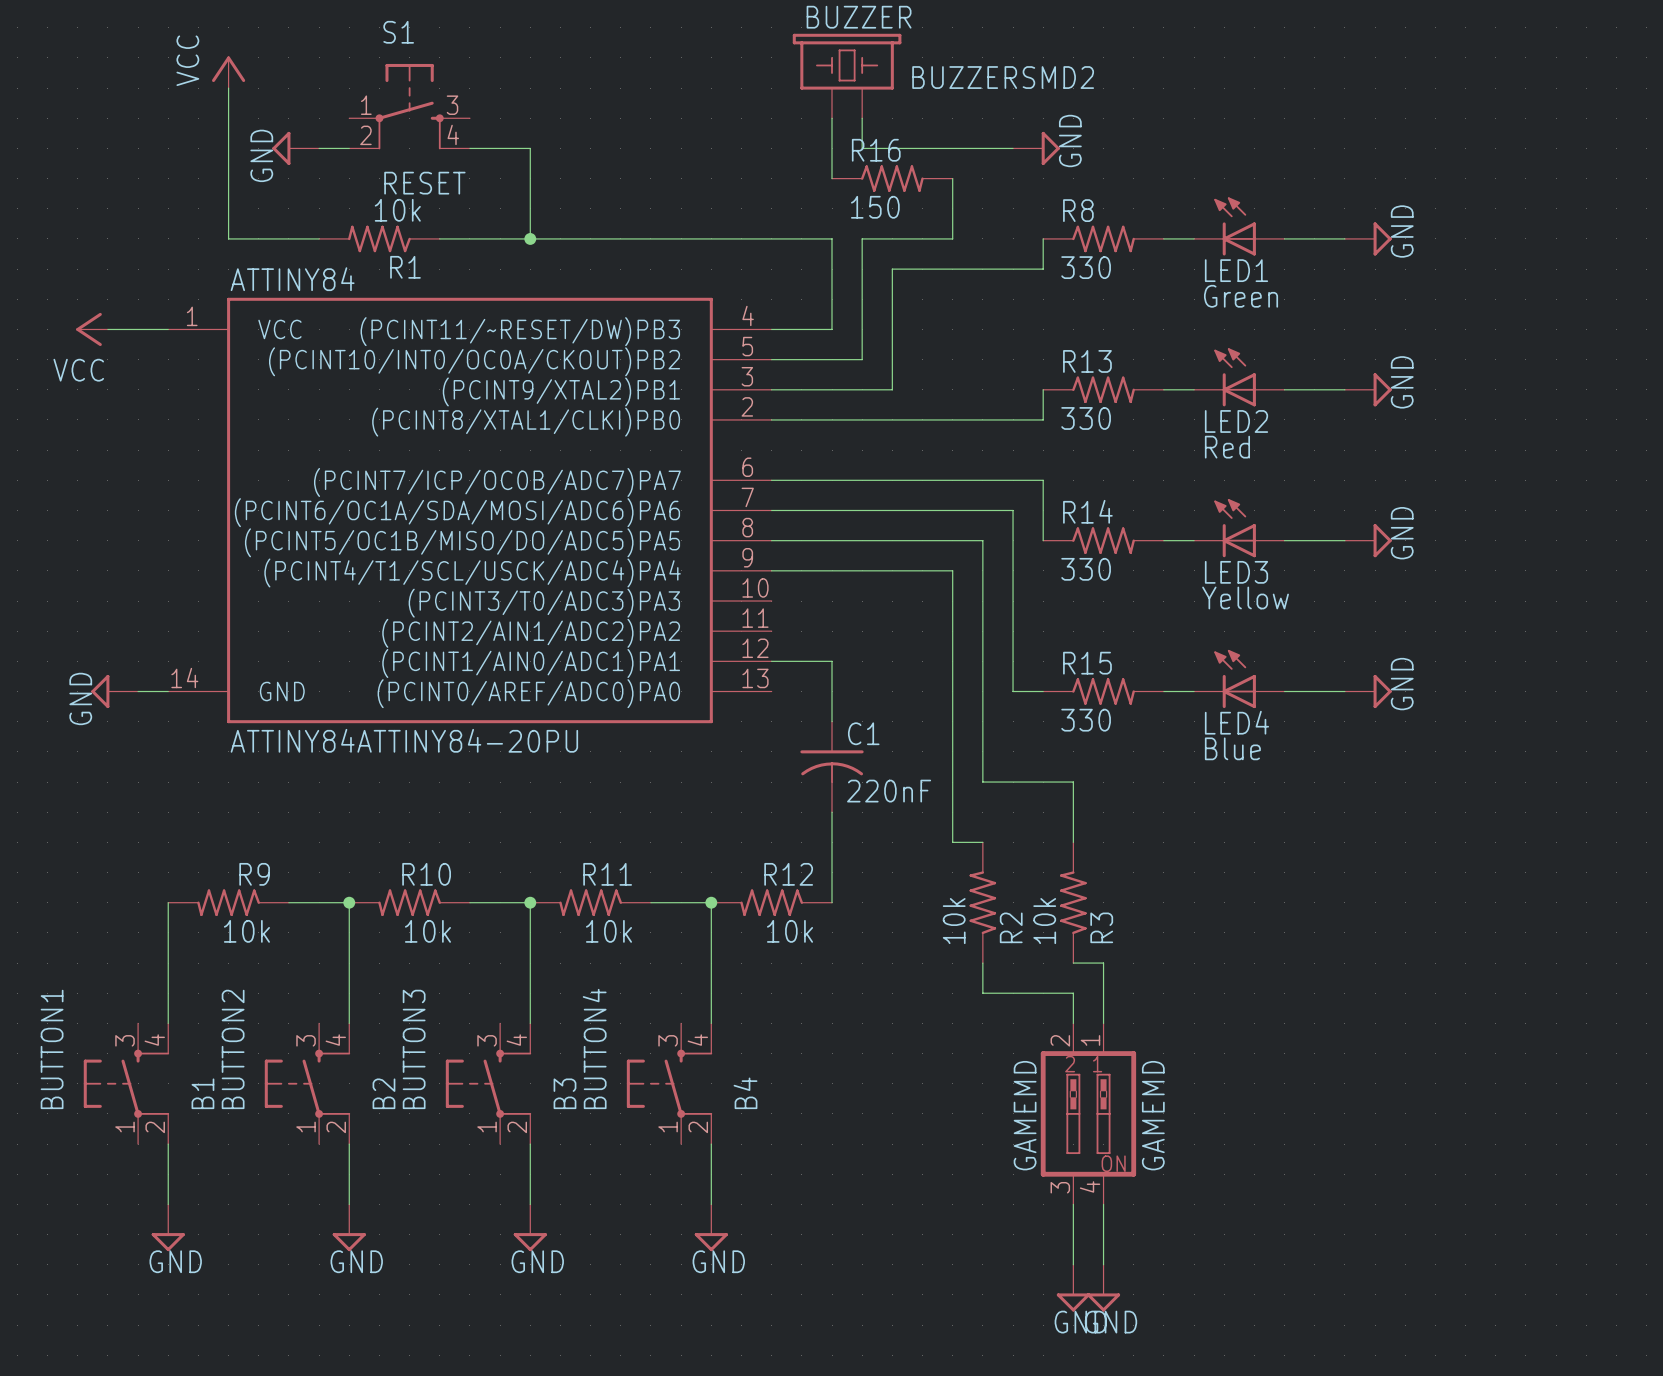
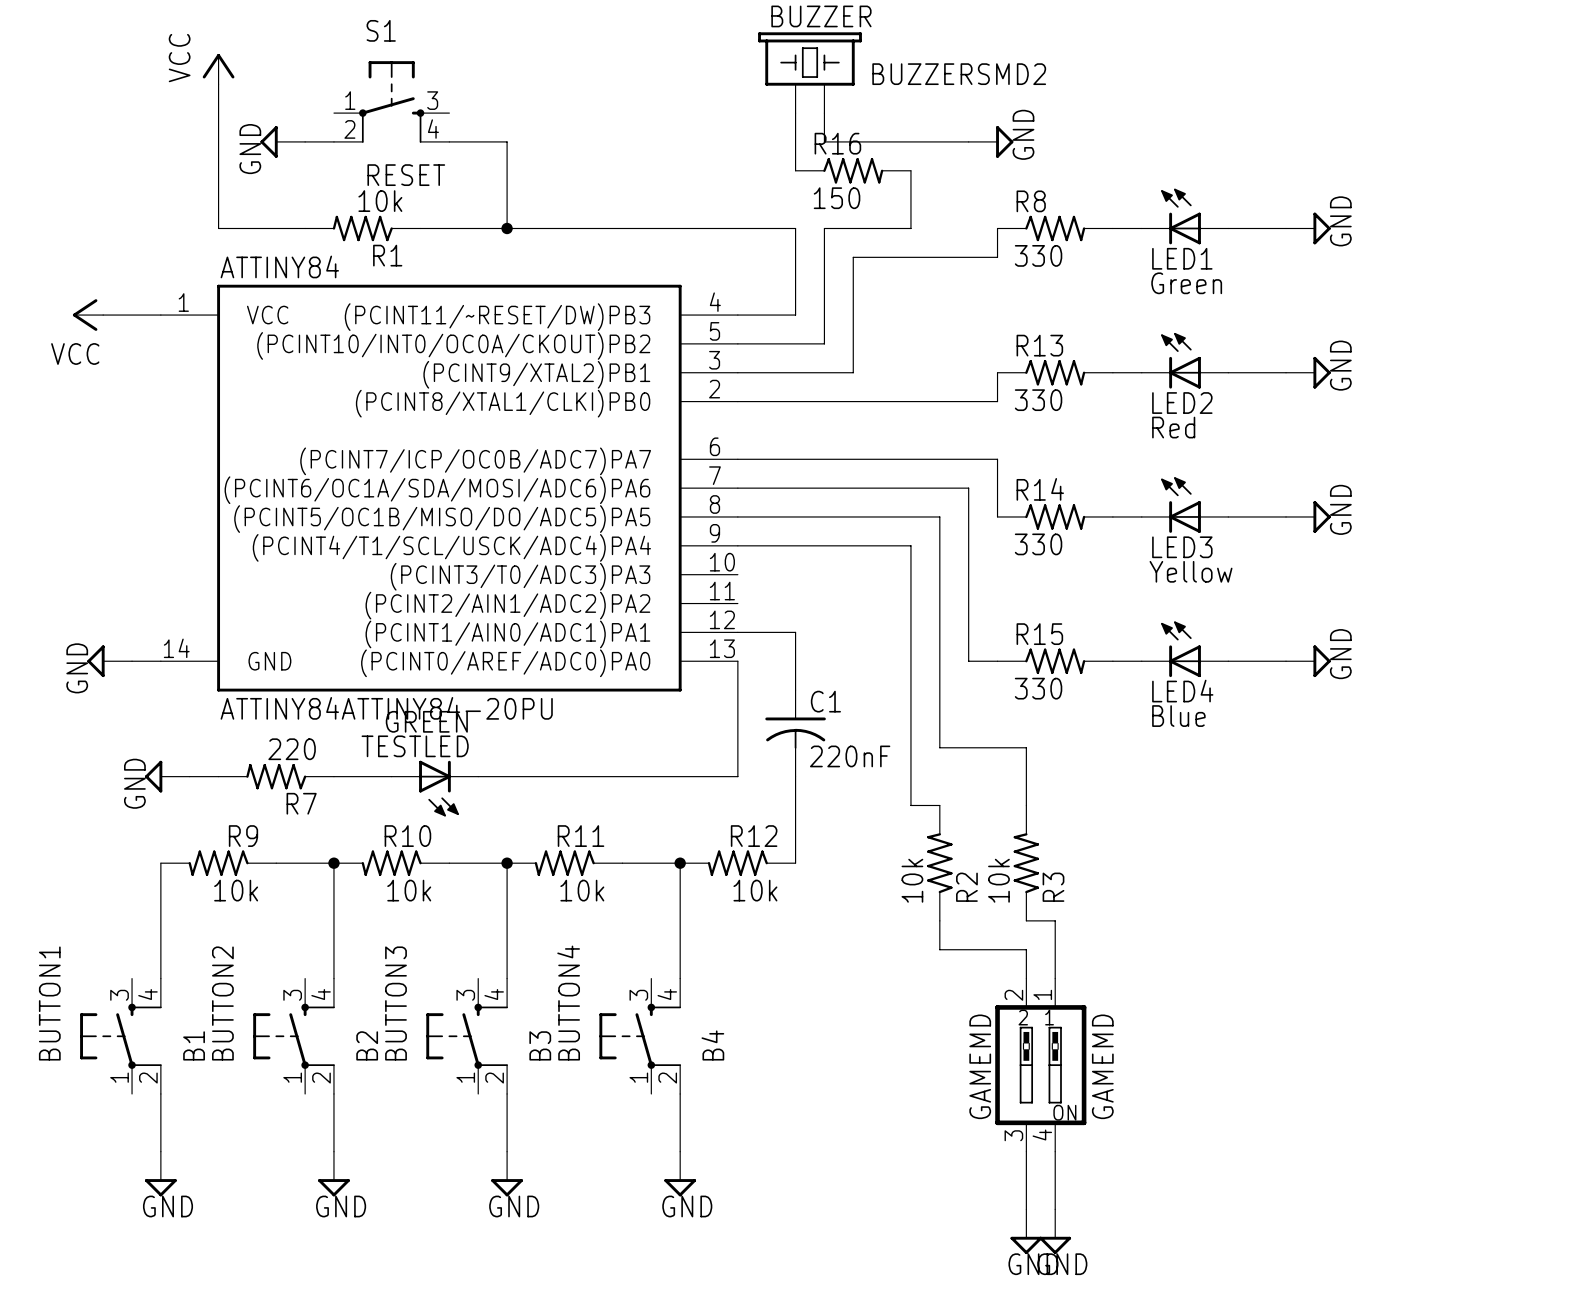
wire: none -> (737, 661) (737, 776) (478, 776)
power symbol: none -> GND (167, 776)
wire: none -> (189, 776) (218, 776)
R7: none -> 220 (276, 776)
wire: none -> (333, 776) (391, 776)
TESTLED: none -> GREEN (434, 788)

